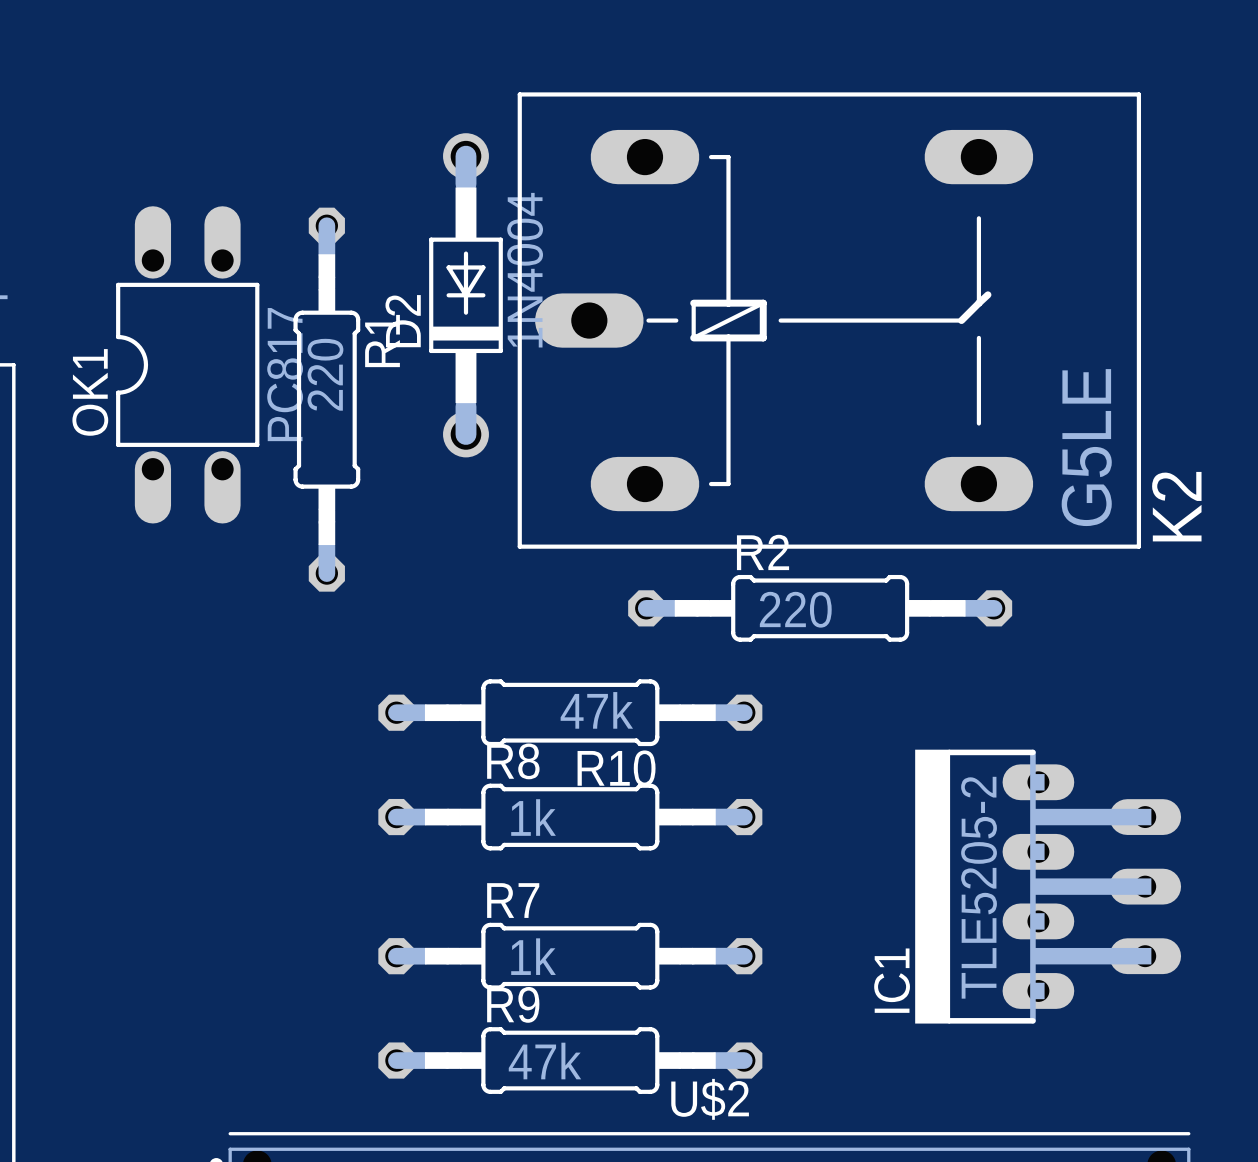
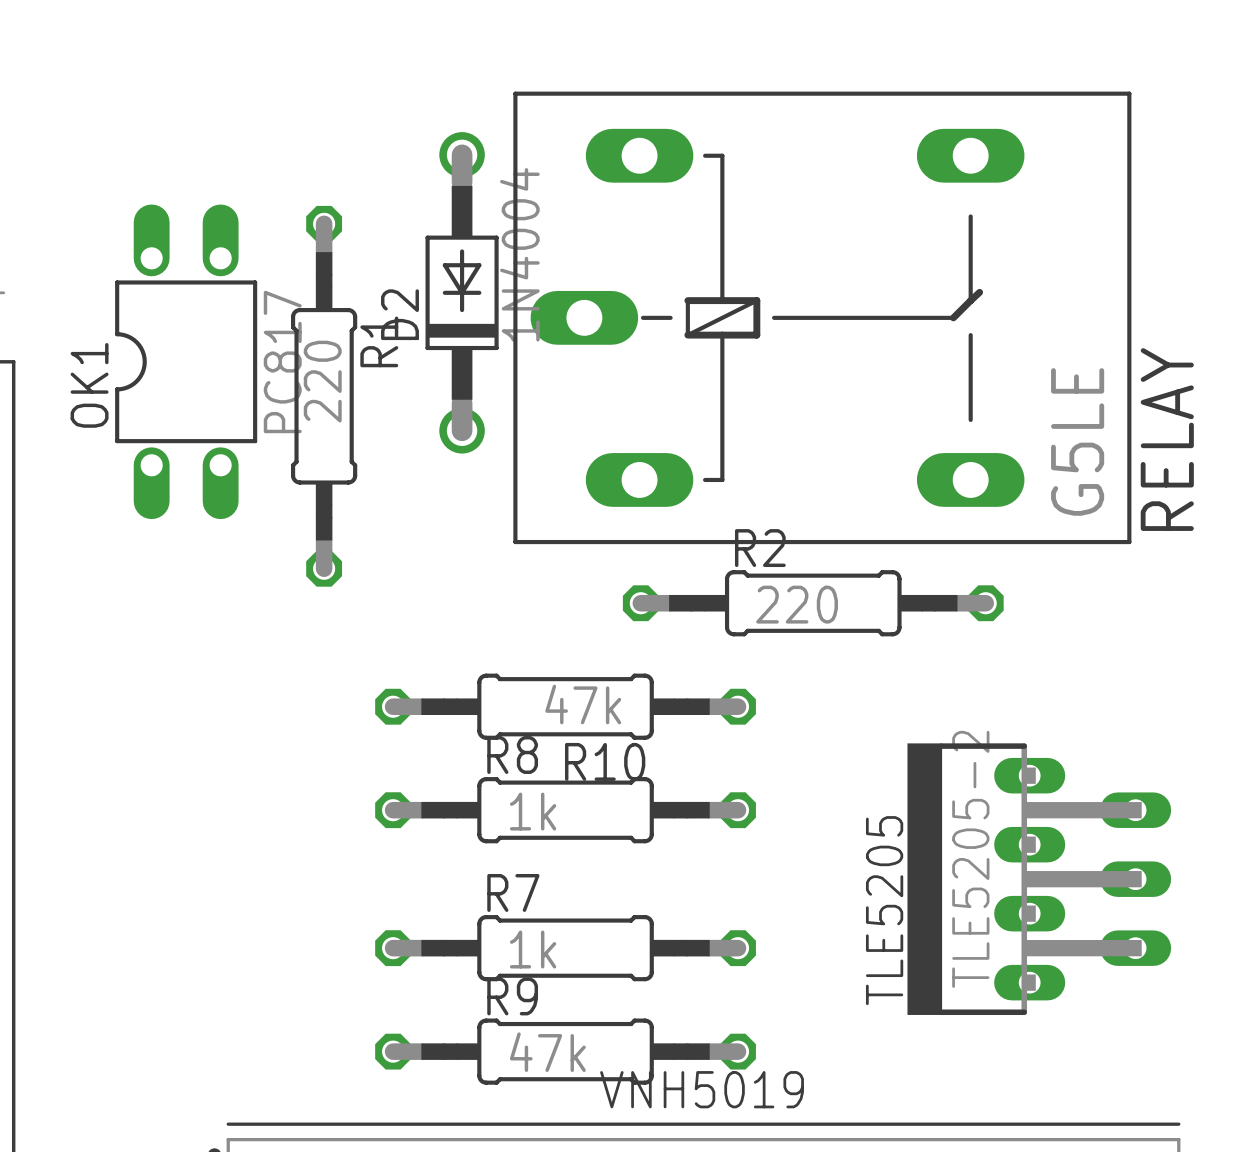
K2 name: K2 (1176, 506) -> RELAY (1167, 439)
IC1 name: IC1 (892, 980) -> TLE5205 (884, 910)
U$2 name: U$2 (710, 1099) -> VNH5019 (702, 1089)

